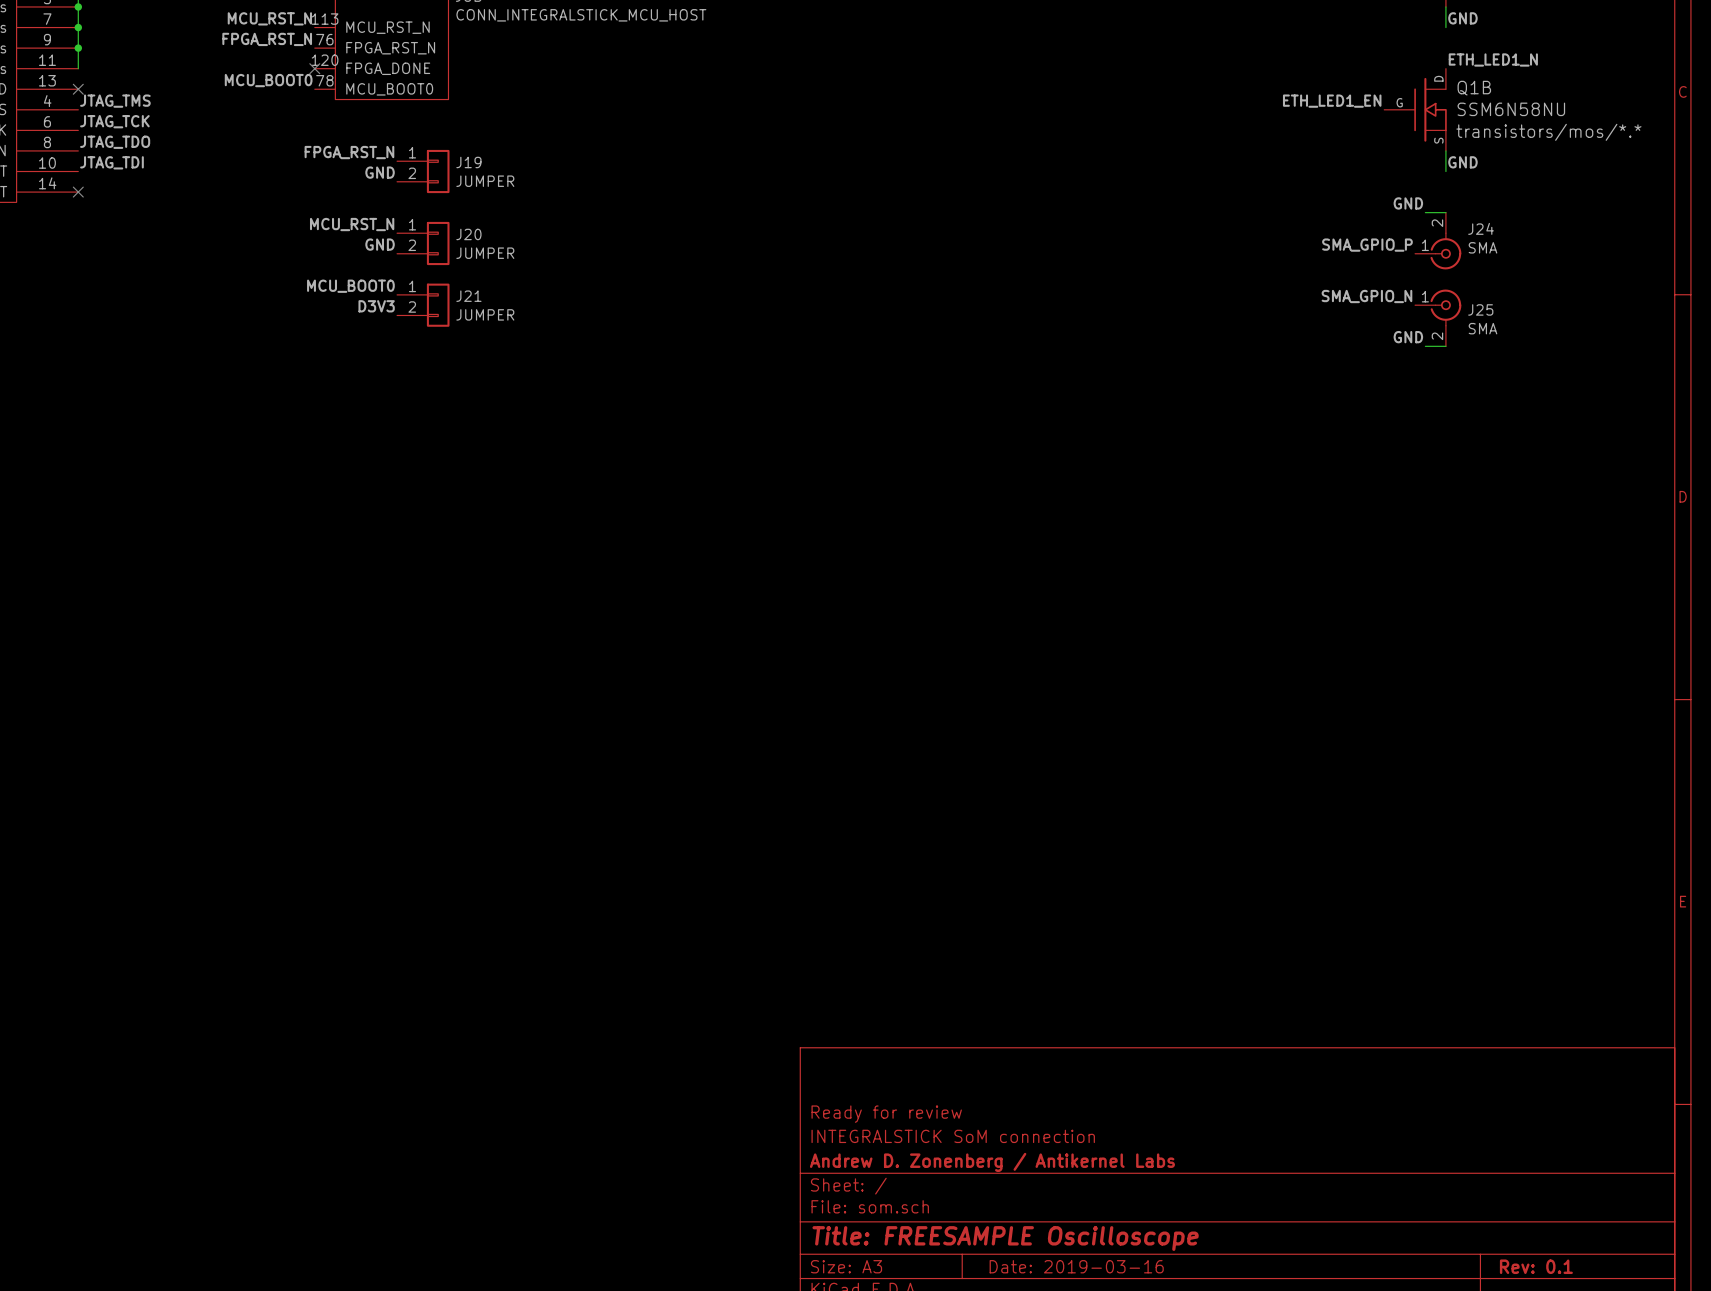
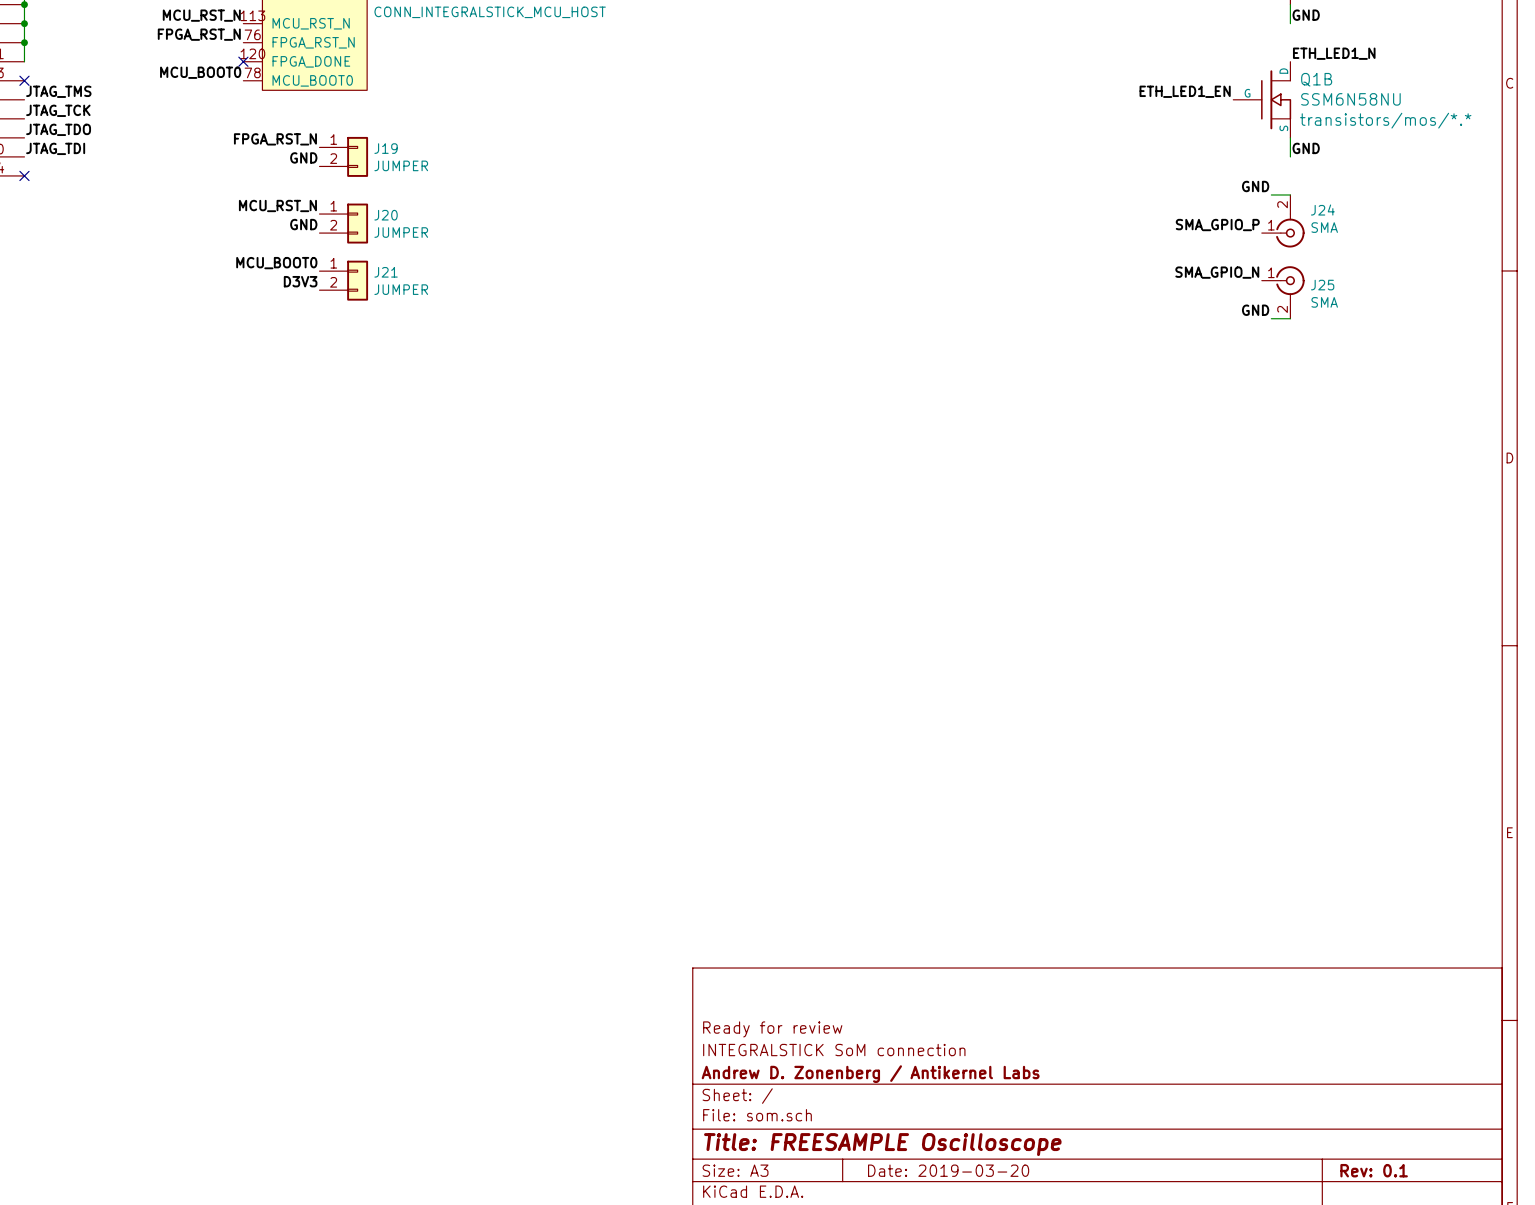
title block: Date: 2019-03-16 (1076, 1266) -> Date: 2019-03-20 (948, 1170)

